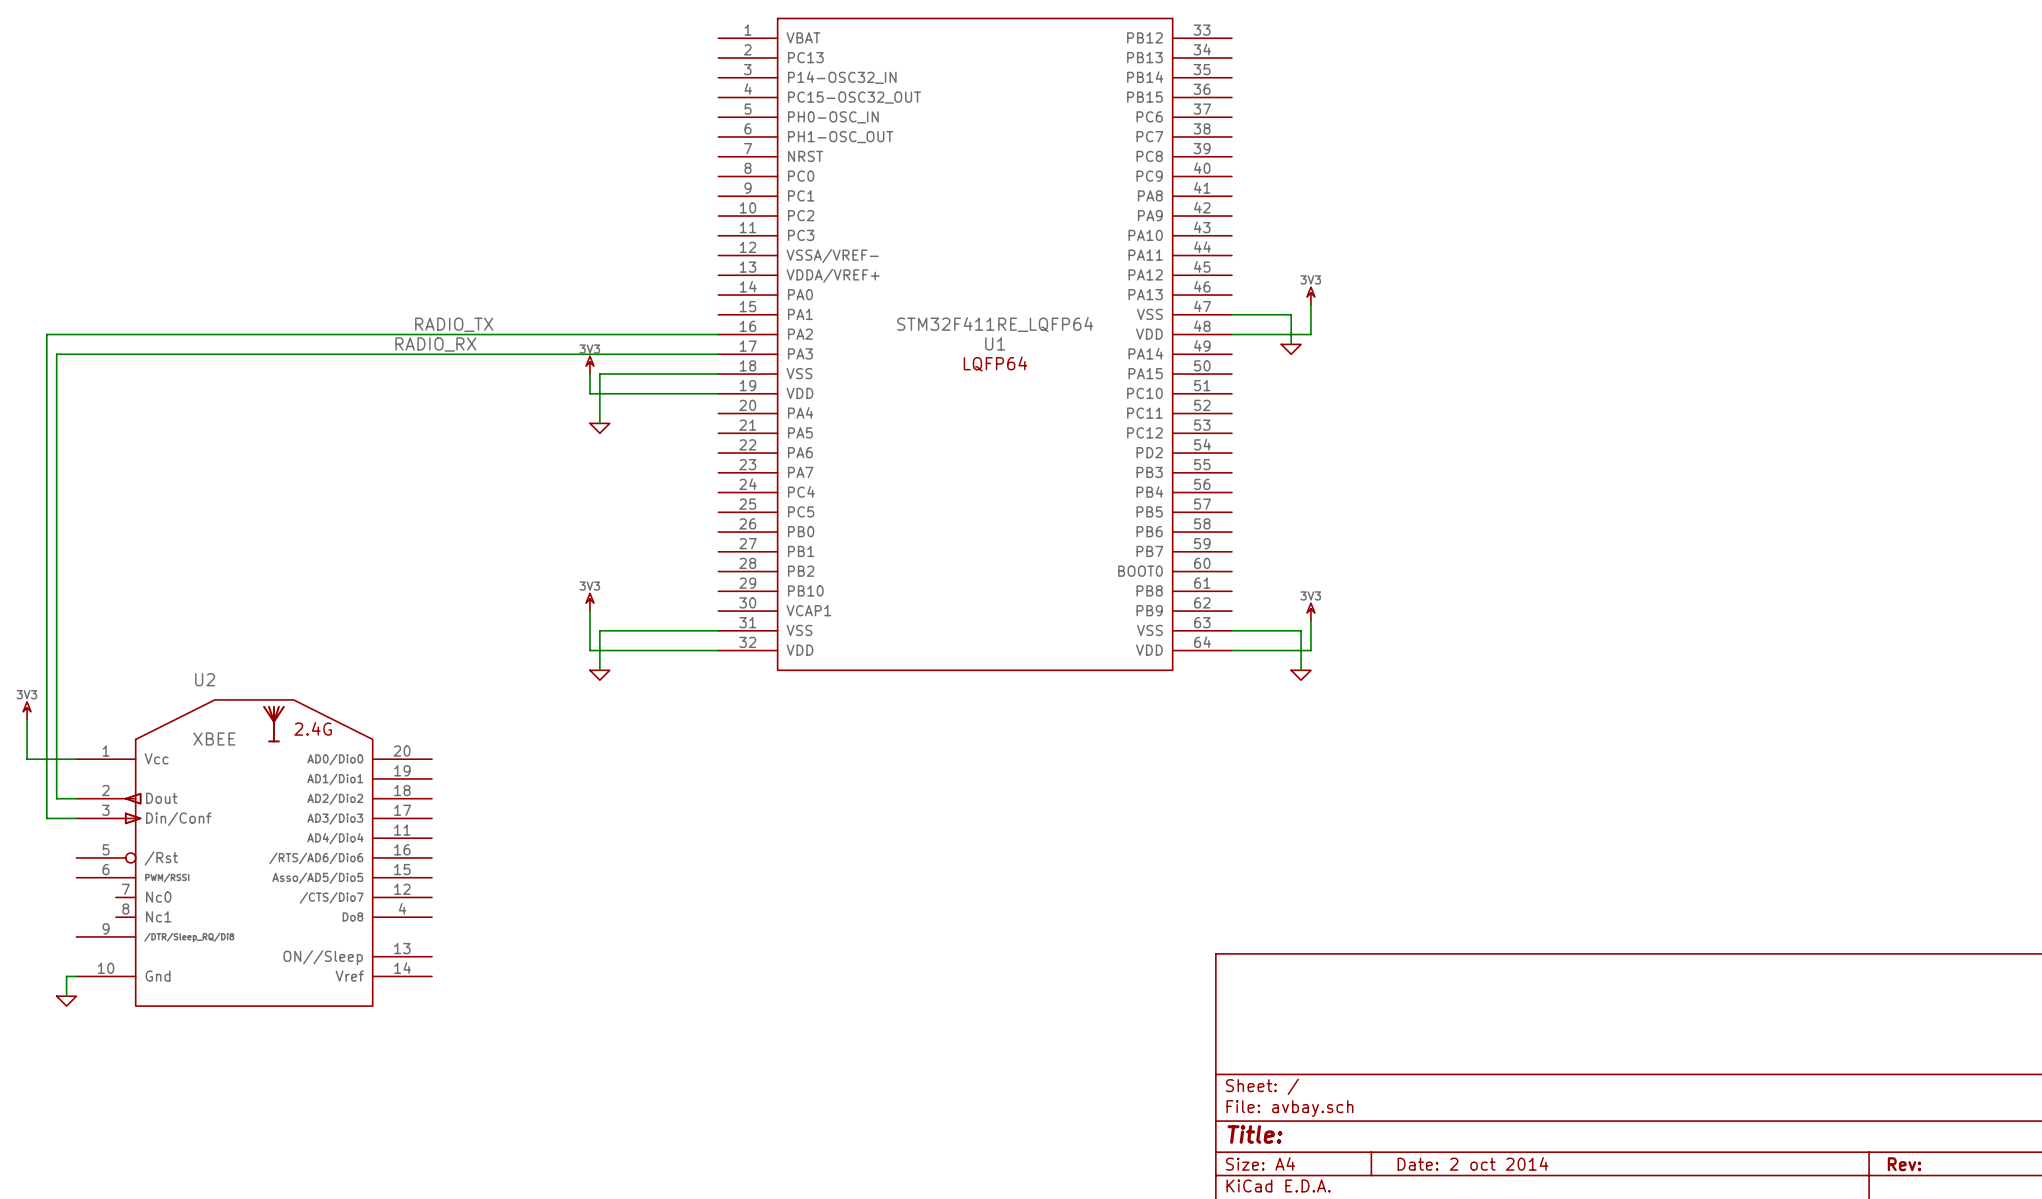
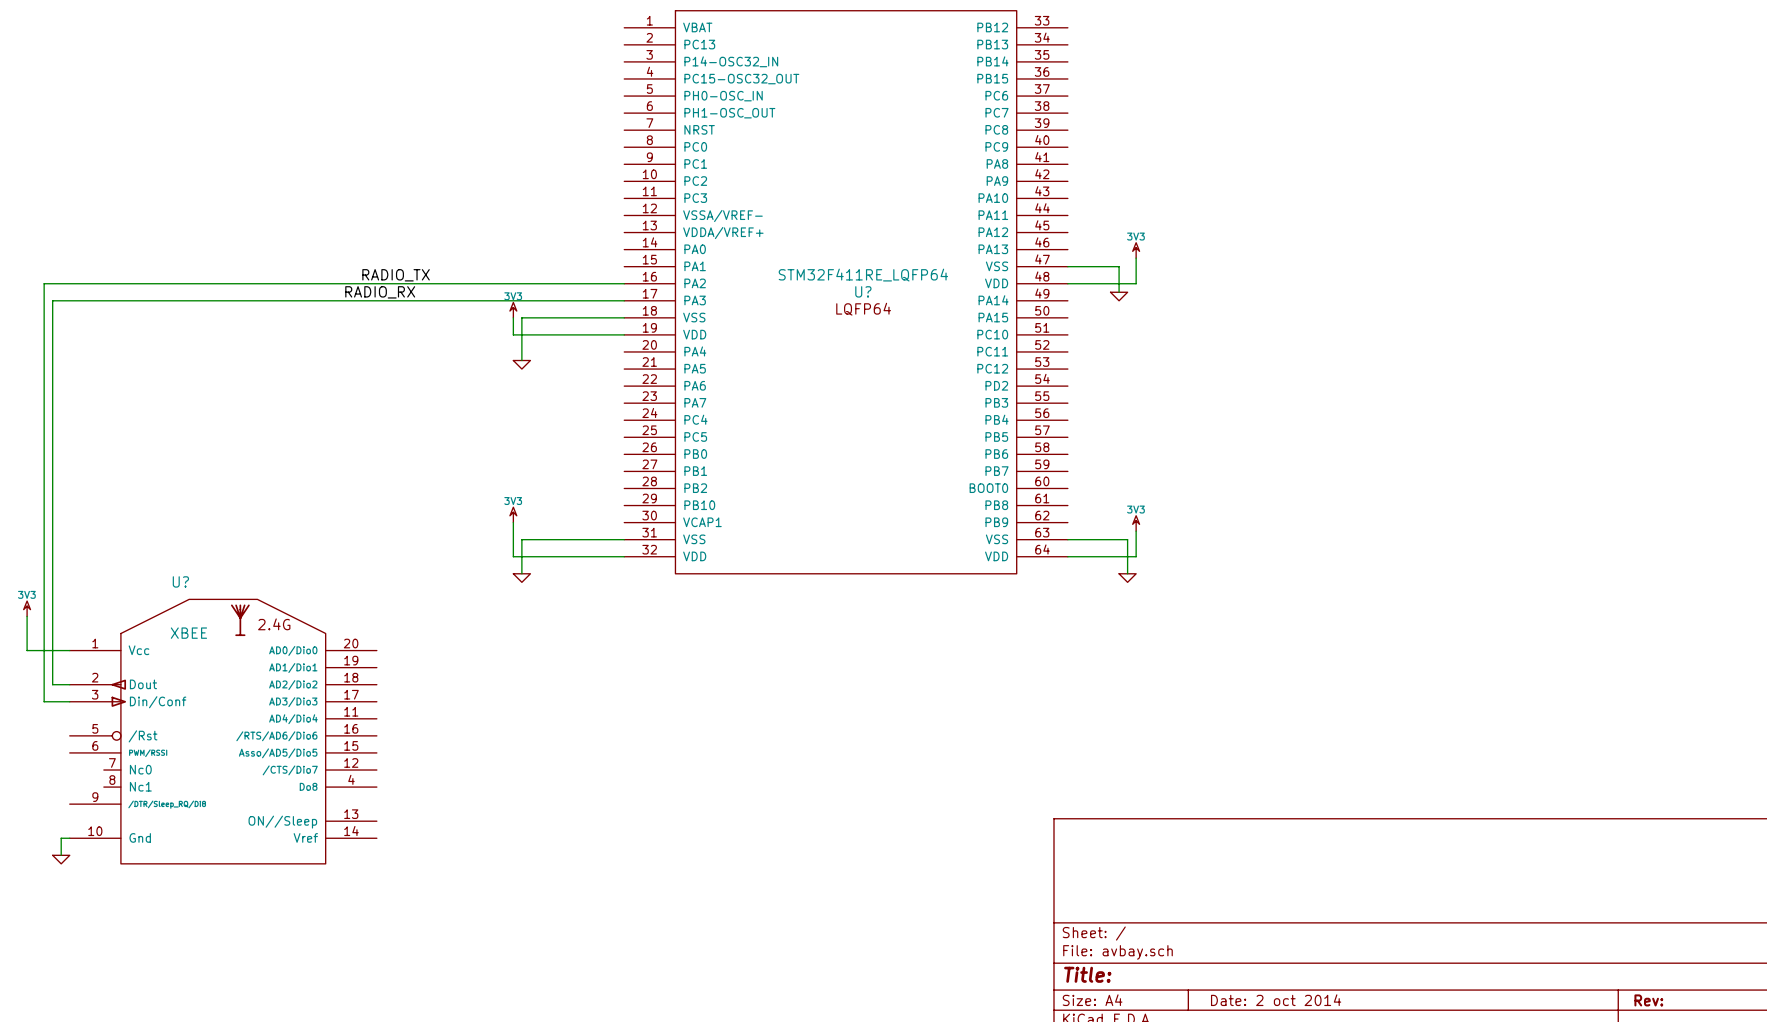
U1 name: U1 (995, 343) -> U? (863, 291)
U2 name: U2 (205, 679) -> U? (180, 581)

